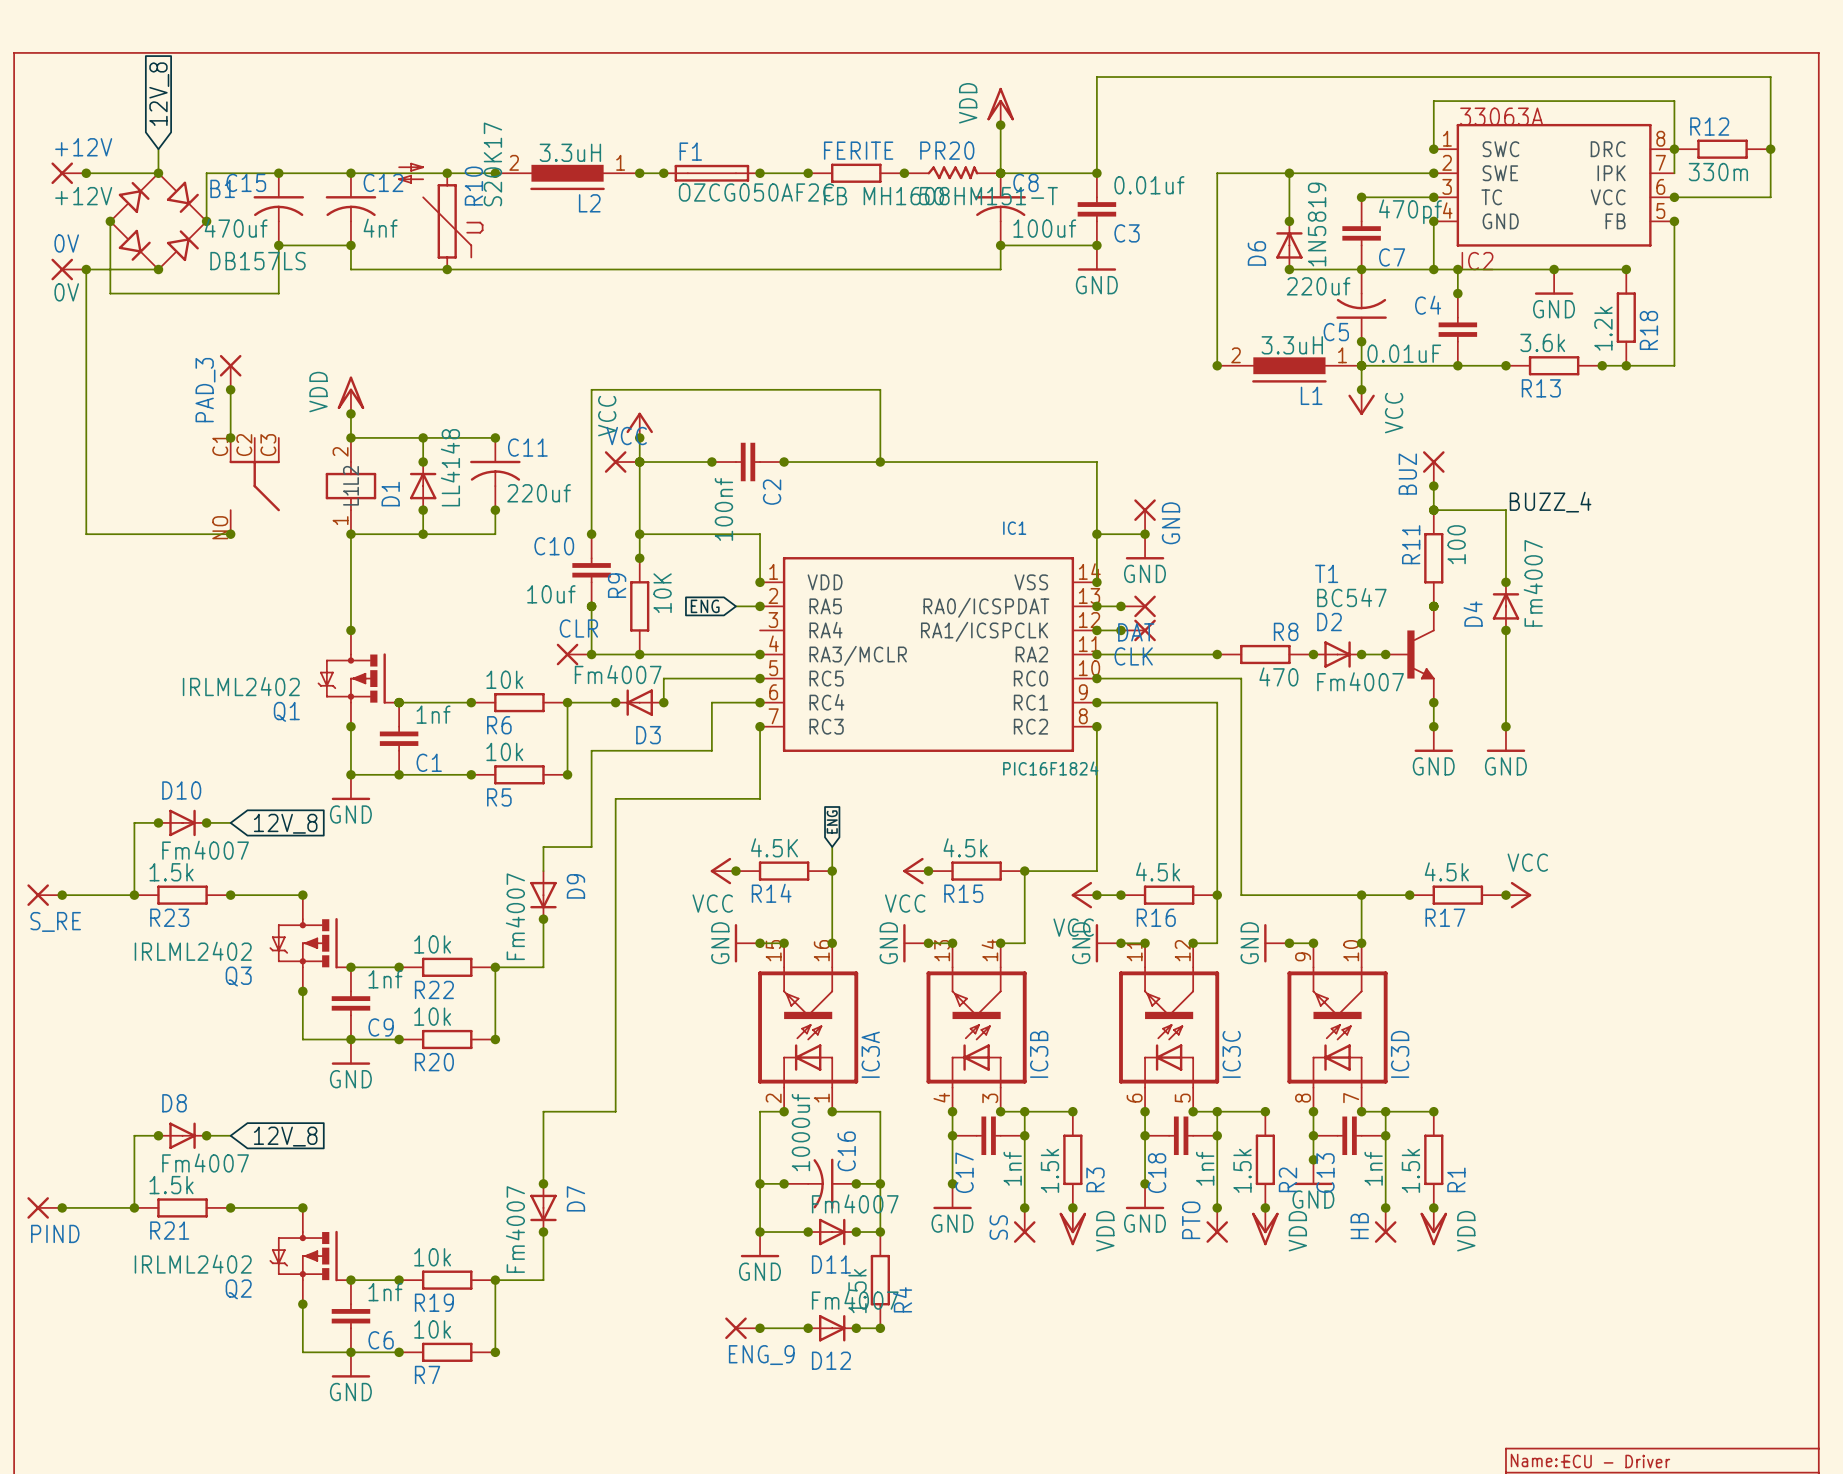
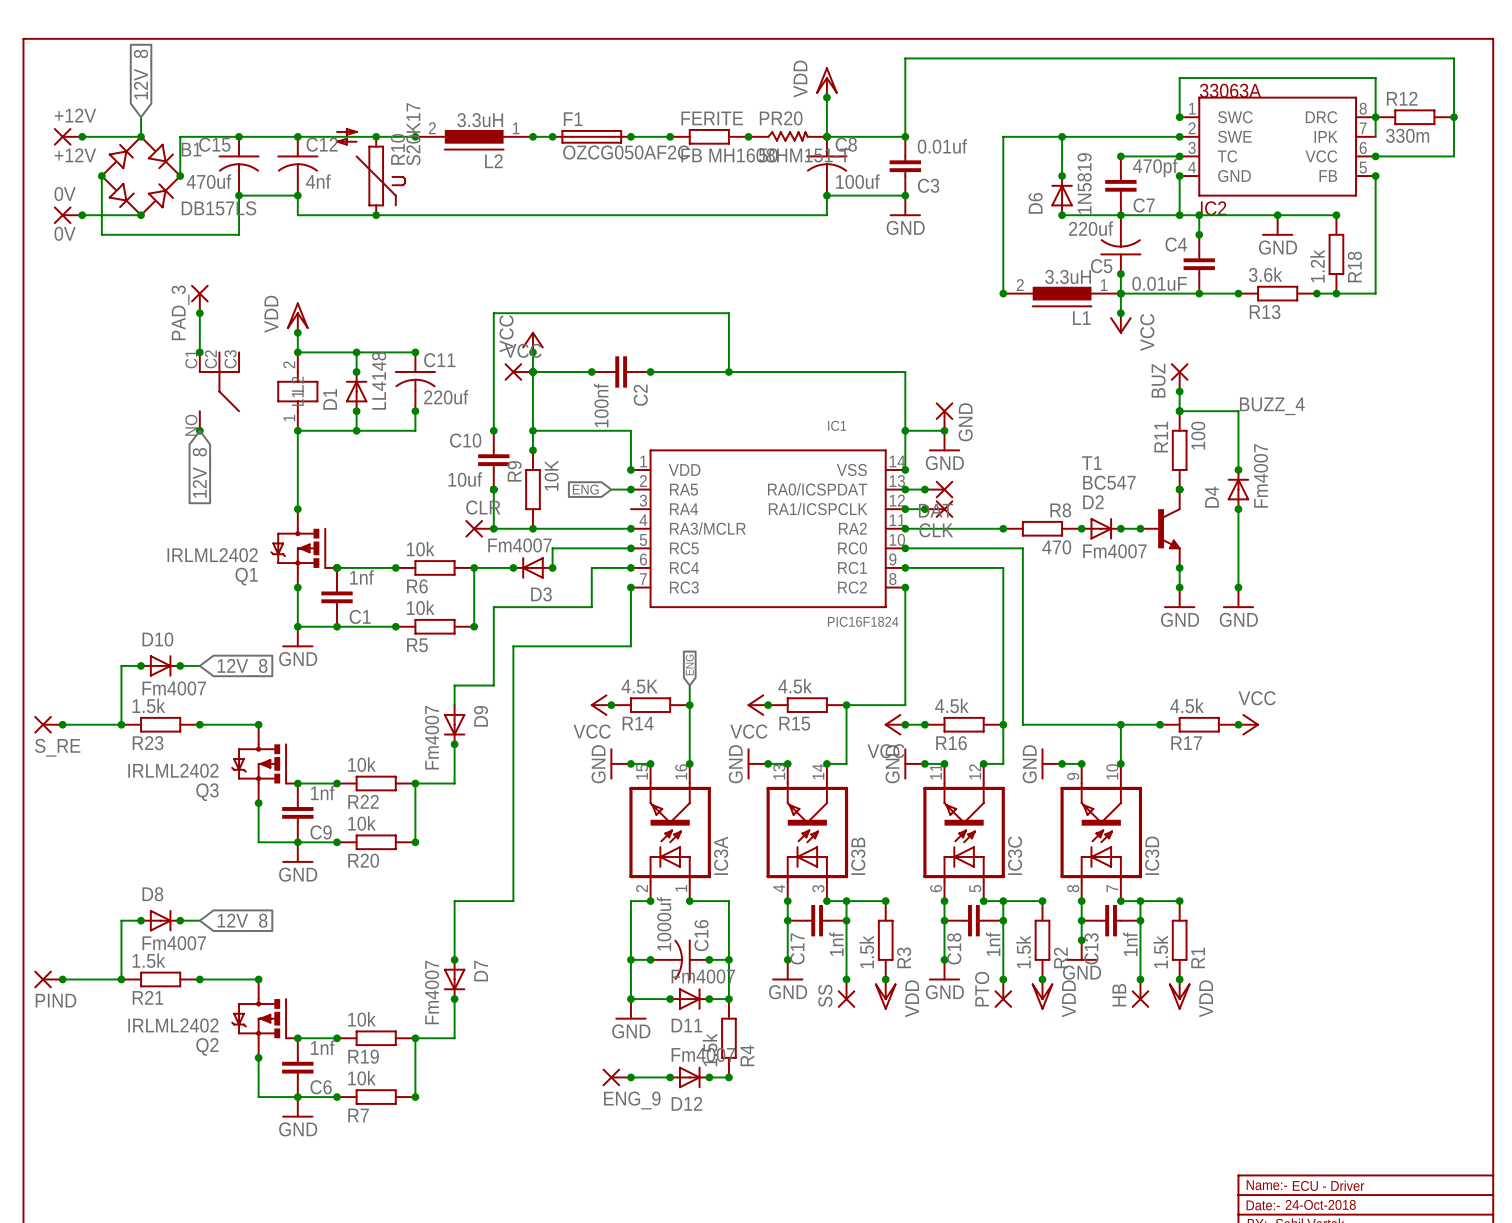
wire: (86, 269) (86, 534) (230, 534) -> none
global label: none -> 12V_8 (201, 472)

